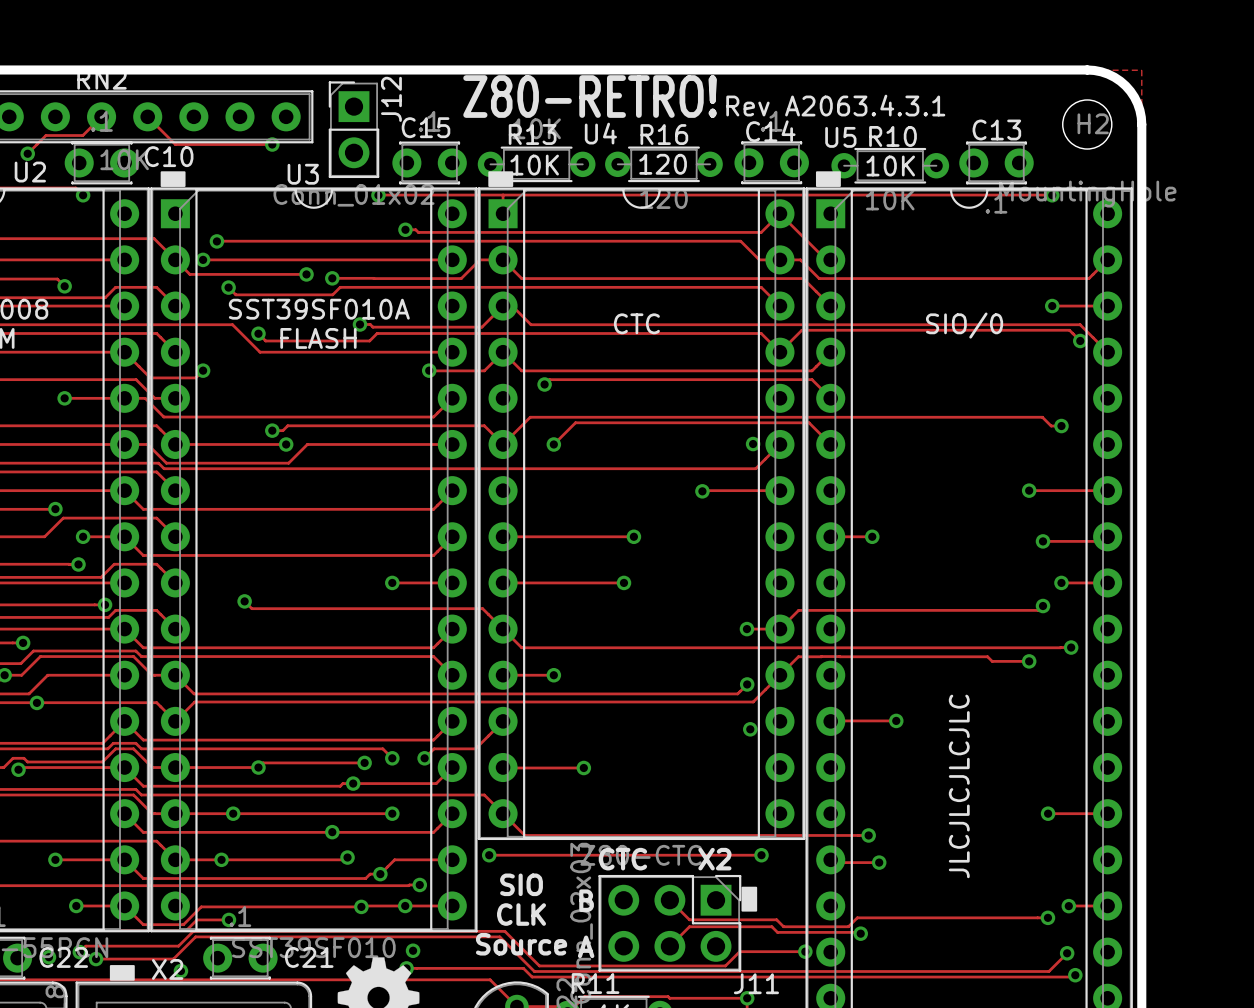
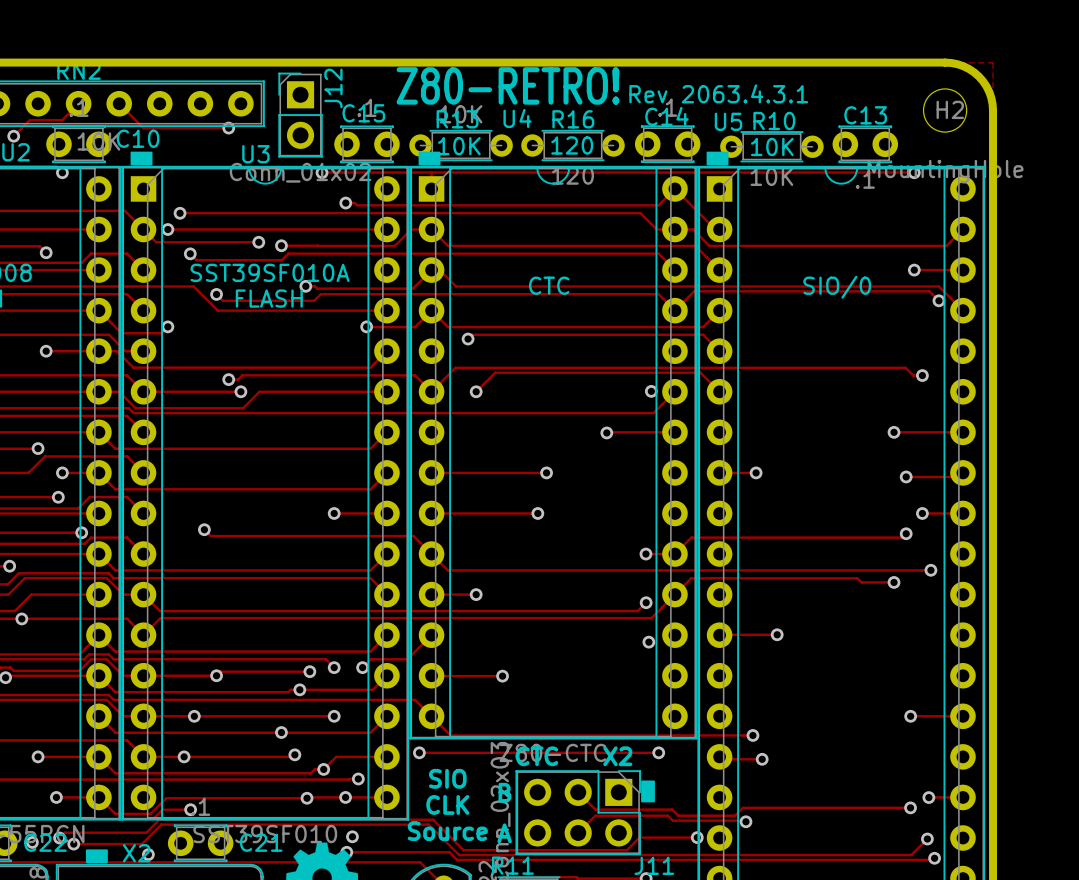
text: Rev A2063.4.3.1 (835, 105) -> Rev 2063.4.3.1 (718, 93)
text: JLCJLCJLCJLC (959, 786) -> none

